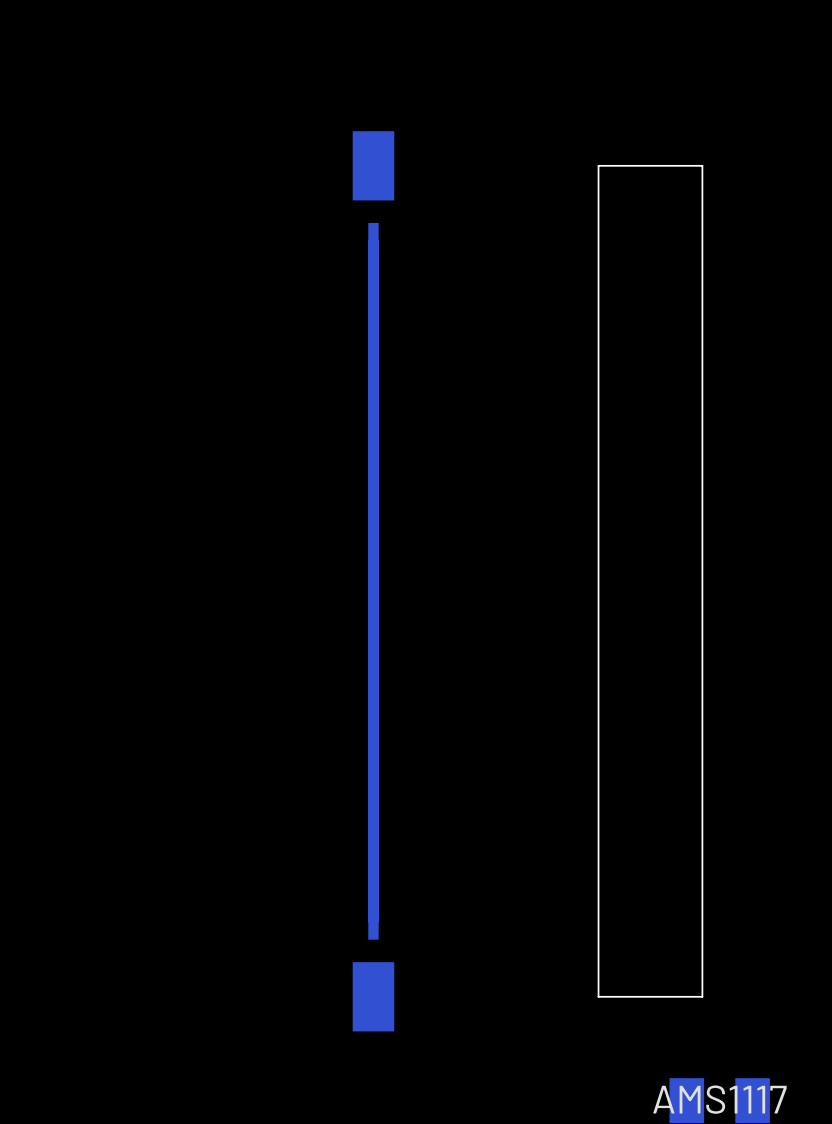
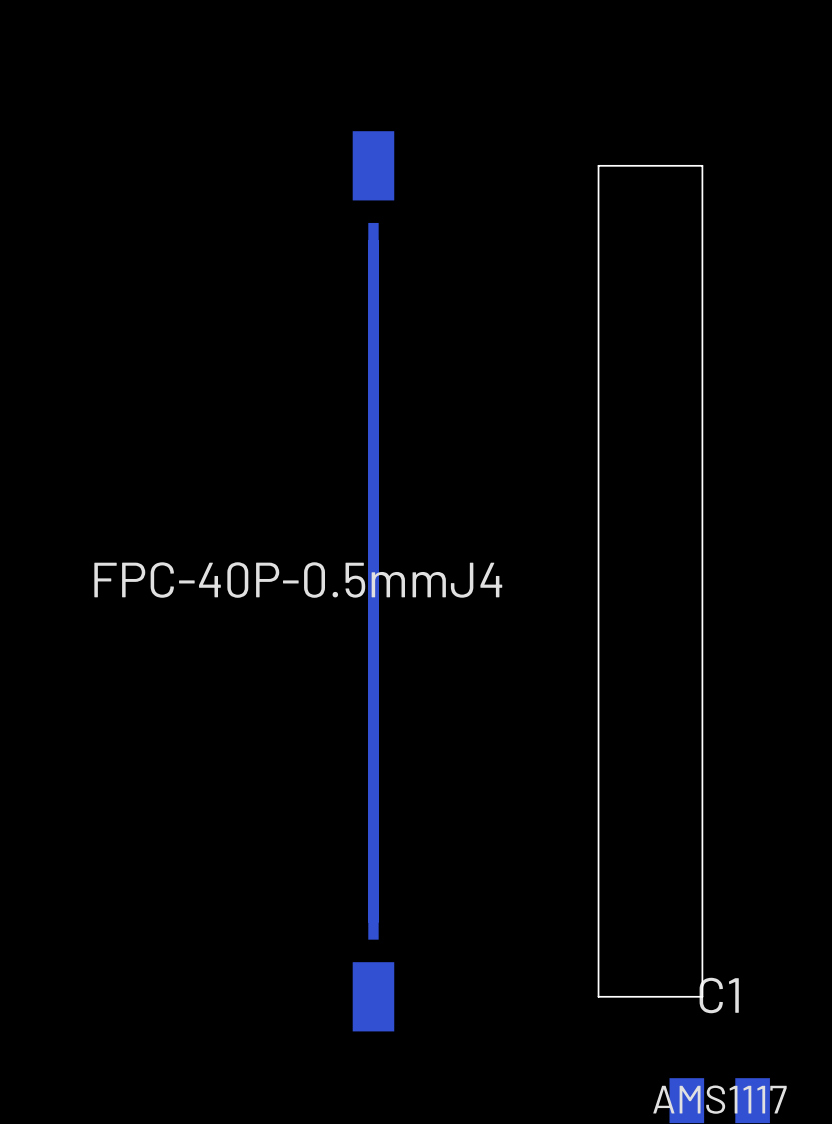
J4 value: none -> FPC-40P-0.5mm (270, 580)
J4 name: none -> J4 (476, 580)
C1 name: none -> C1 (719, 995)

